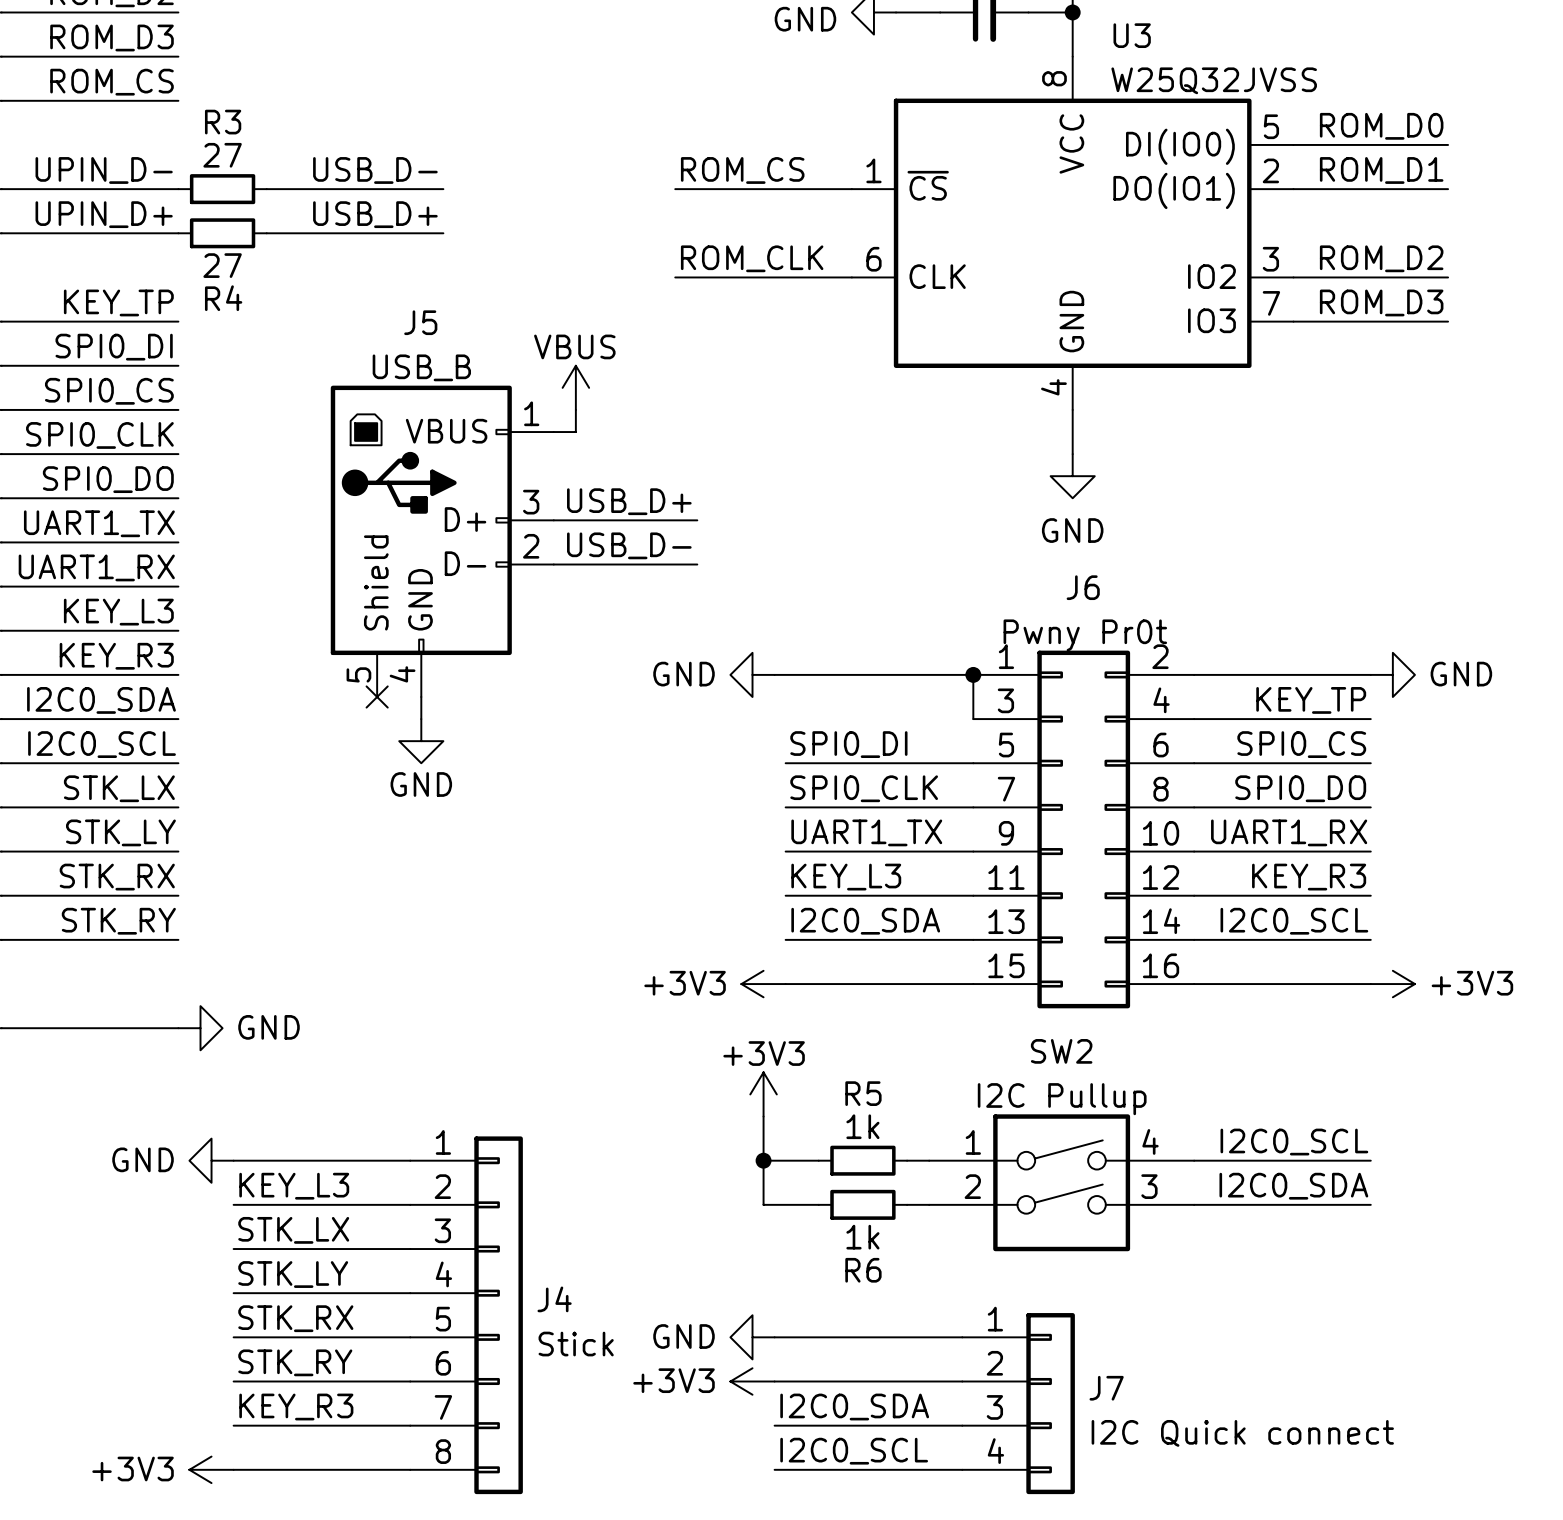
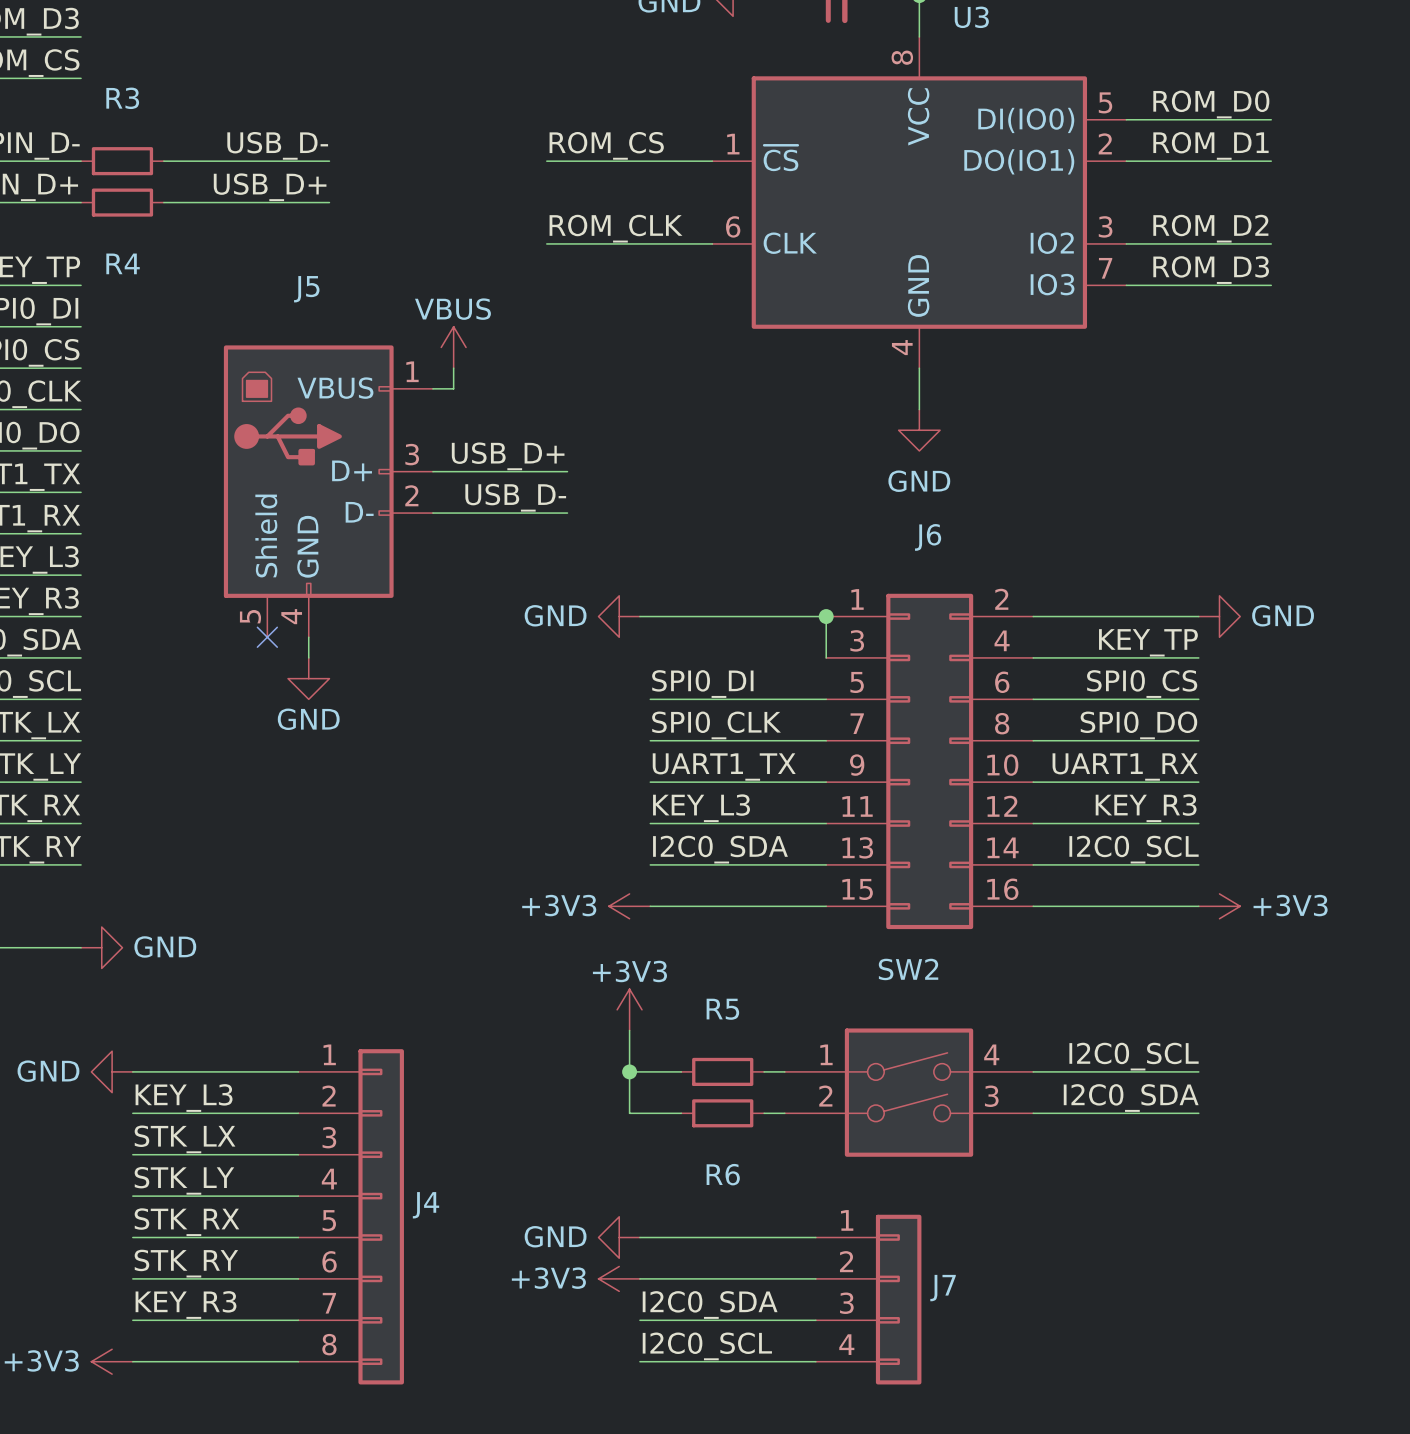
U3 value: W25Q32JVSS (1214, 80) -> none
R3 value: 27 (222, 155) -> none
R4 value: 27 (222, 265) -> none
J5 value: USB_B (421, 367) -> none
J6 value: Pwny Pr0t (1085, 635) -> none
SW2 value: I2C Pullup (1062, 1099) -> none
R5 value: 1k (862, 1126) -> none
R6 value: 1k (862, 1237) -> none
J4 value: Stick (576, 1344) -> none
J7 value: I2C Quick connect (1242, 1433) -> none

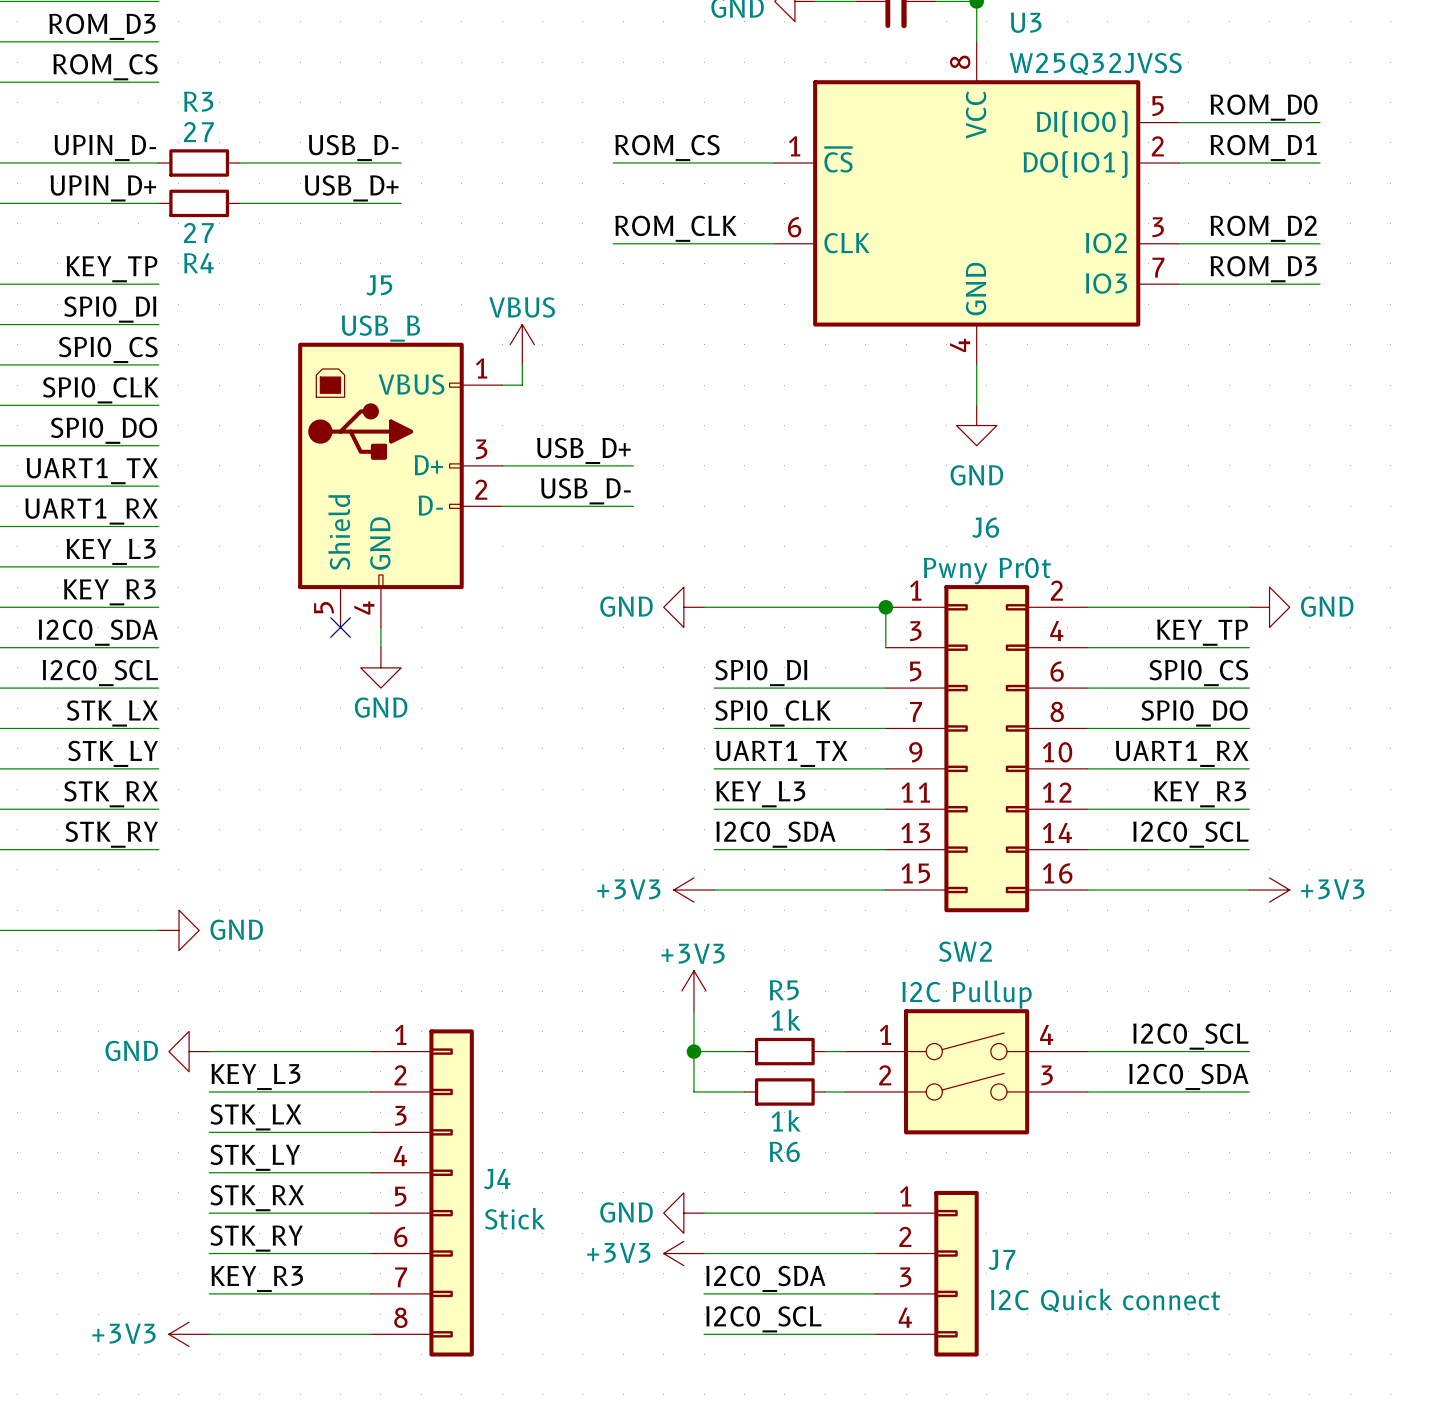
U3 value: none -> W25Q32JVSS (1095, 63)
R3 value: none -> 27 (198, 132)
R4 value: none -> 27 (198, 232)
J5 value: none -> USB_B (380, 328)
J6 value: none -> Pwny Pr0t (987, 571)
SW2 value: none -> I2C Pullup (967, 994)
R5 value: none -> 1k (786, 1019)
R6 value: none -> 1k (786, 1120)
J4 value: none -> Stick (515, 1218)
J7 value: none -> I2C Quick connect (1105, 1300)

